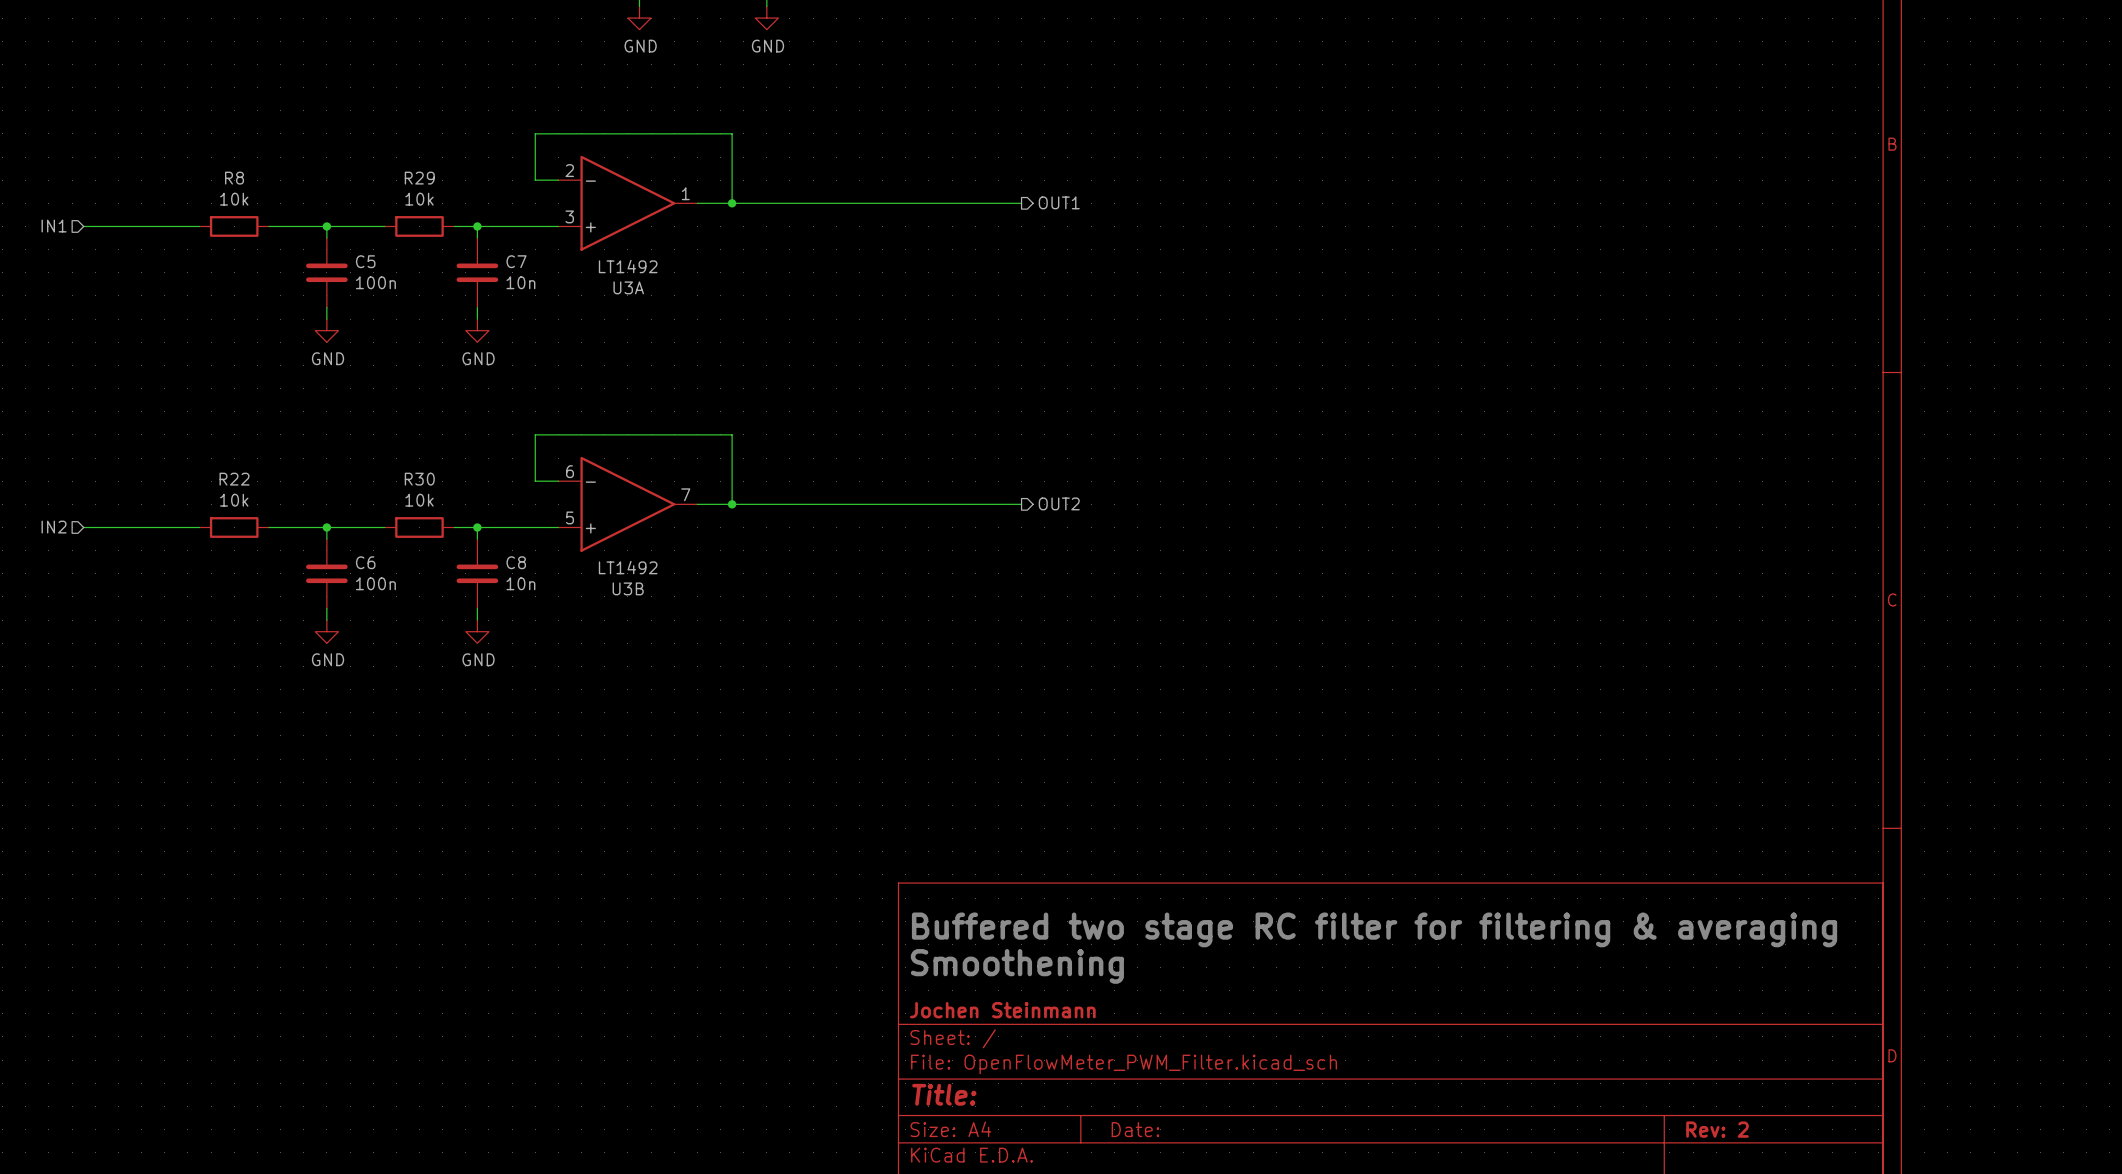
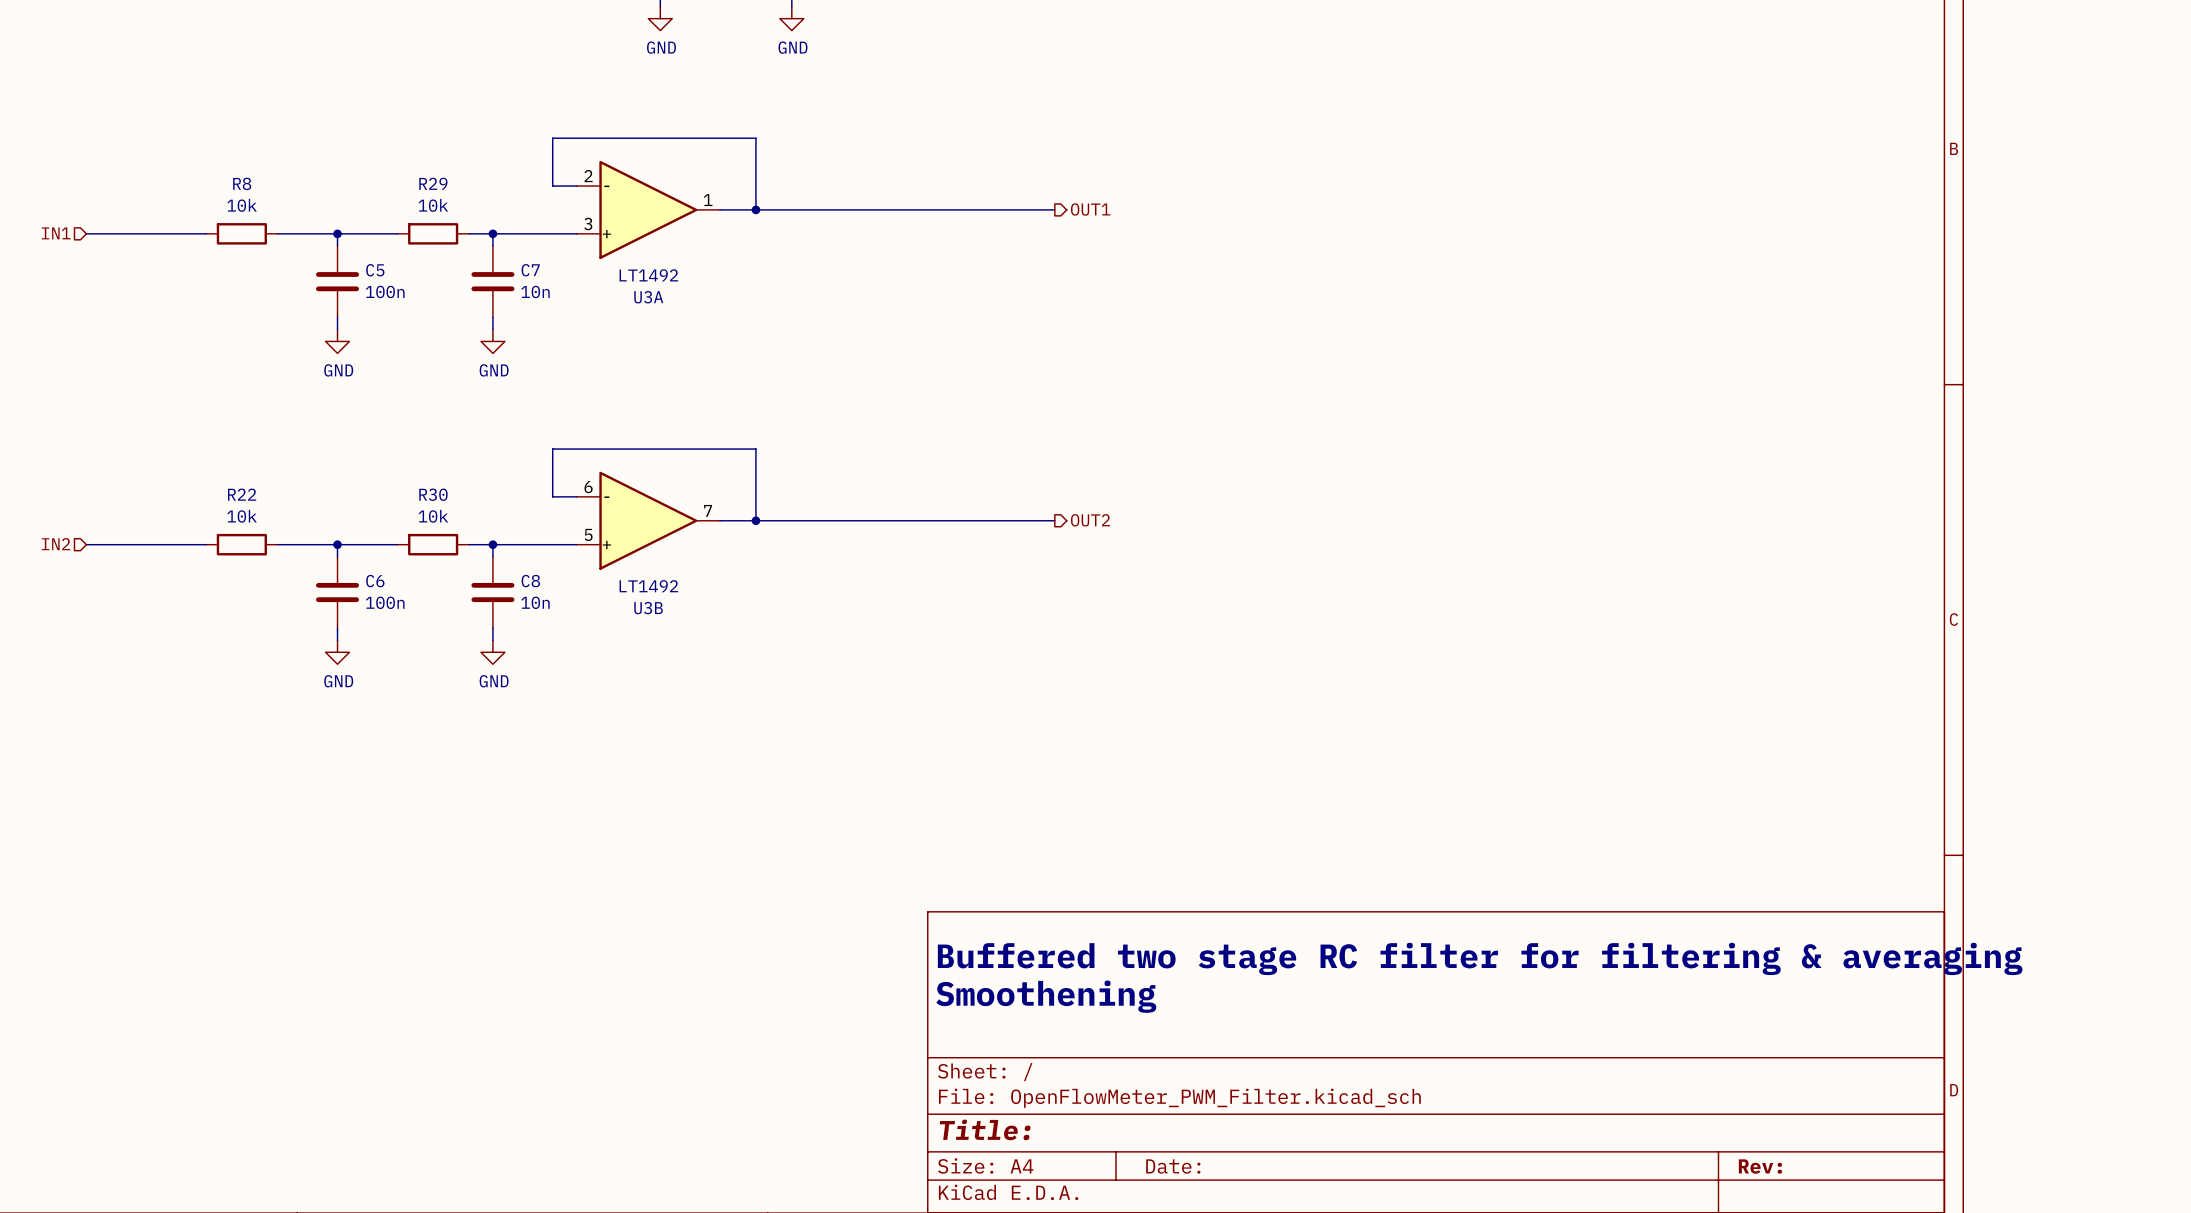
title block: Jochen Steinmann (1002, 1010) -> none
title block: Rev: 2 (1717, 1129) -> Rev: (1760, 1166)

